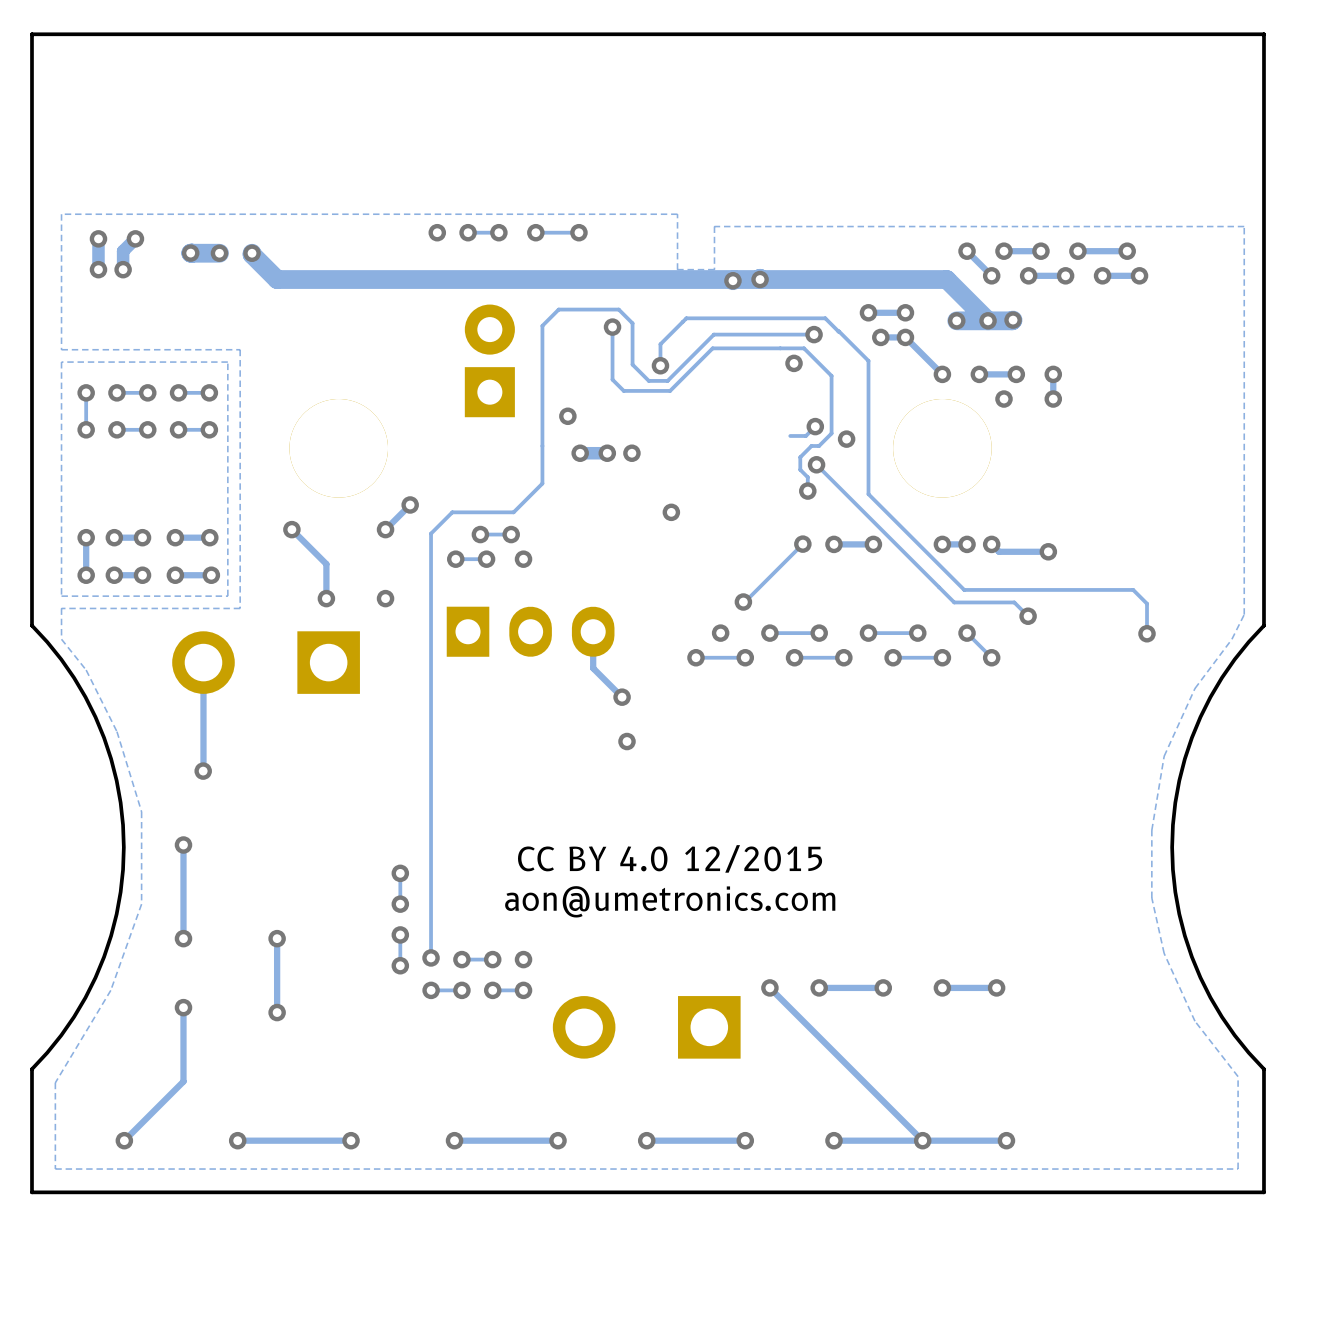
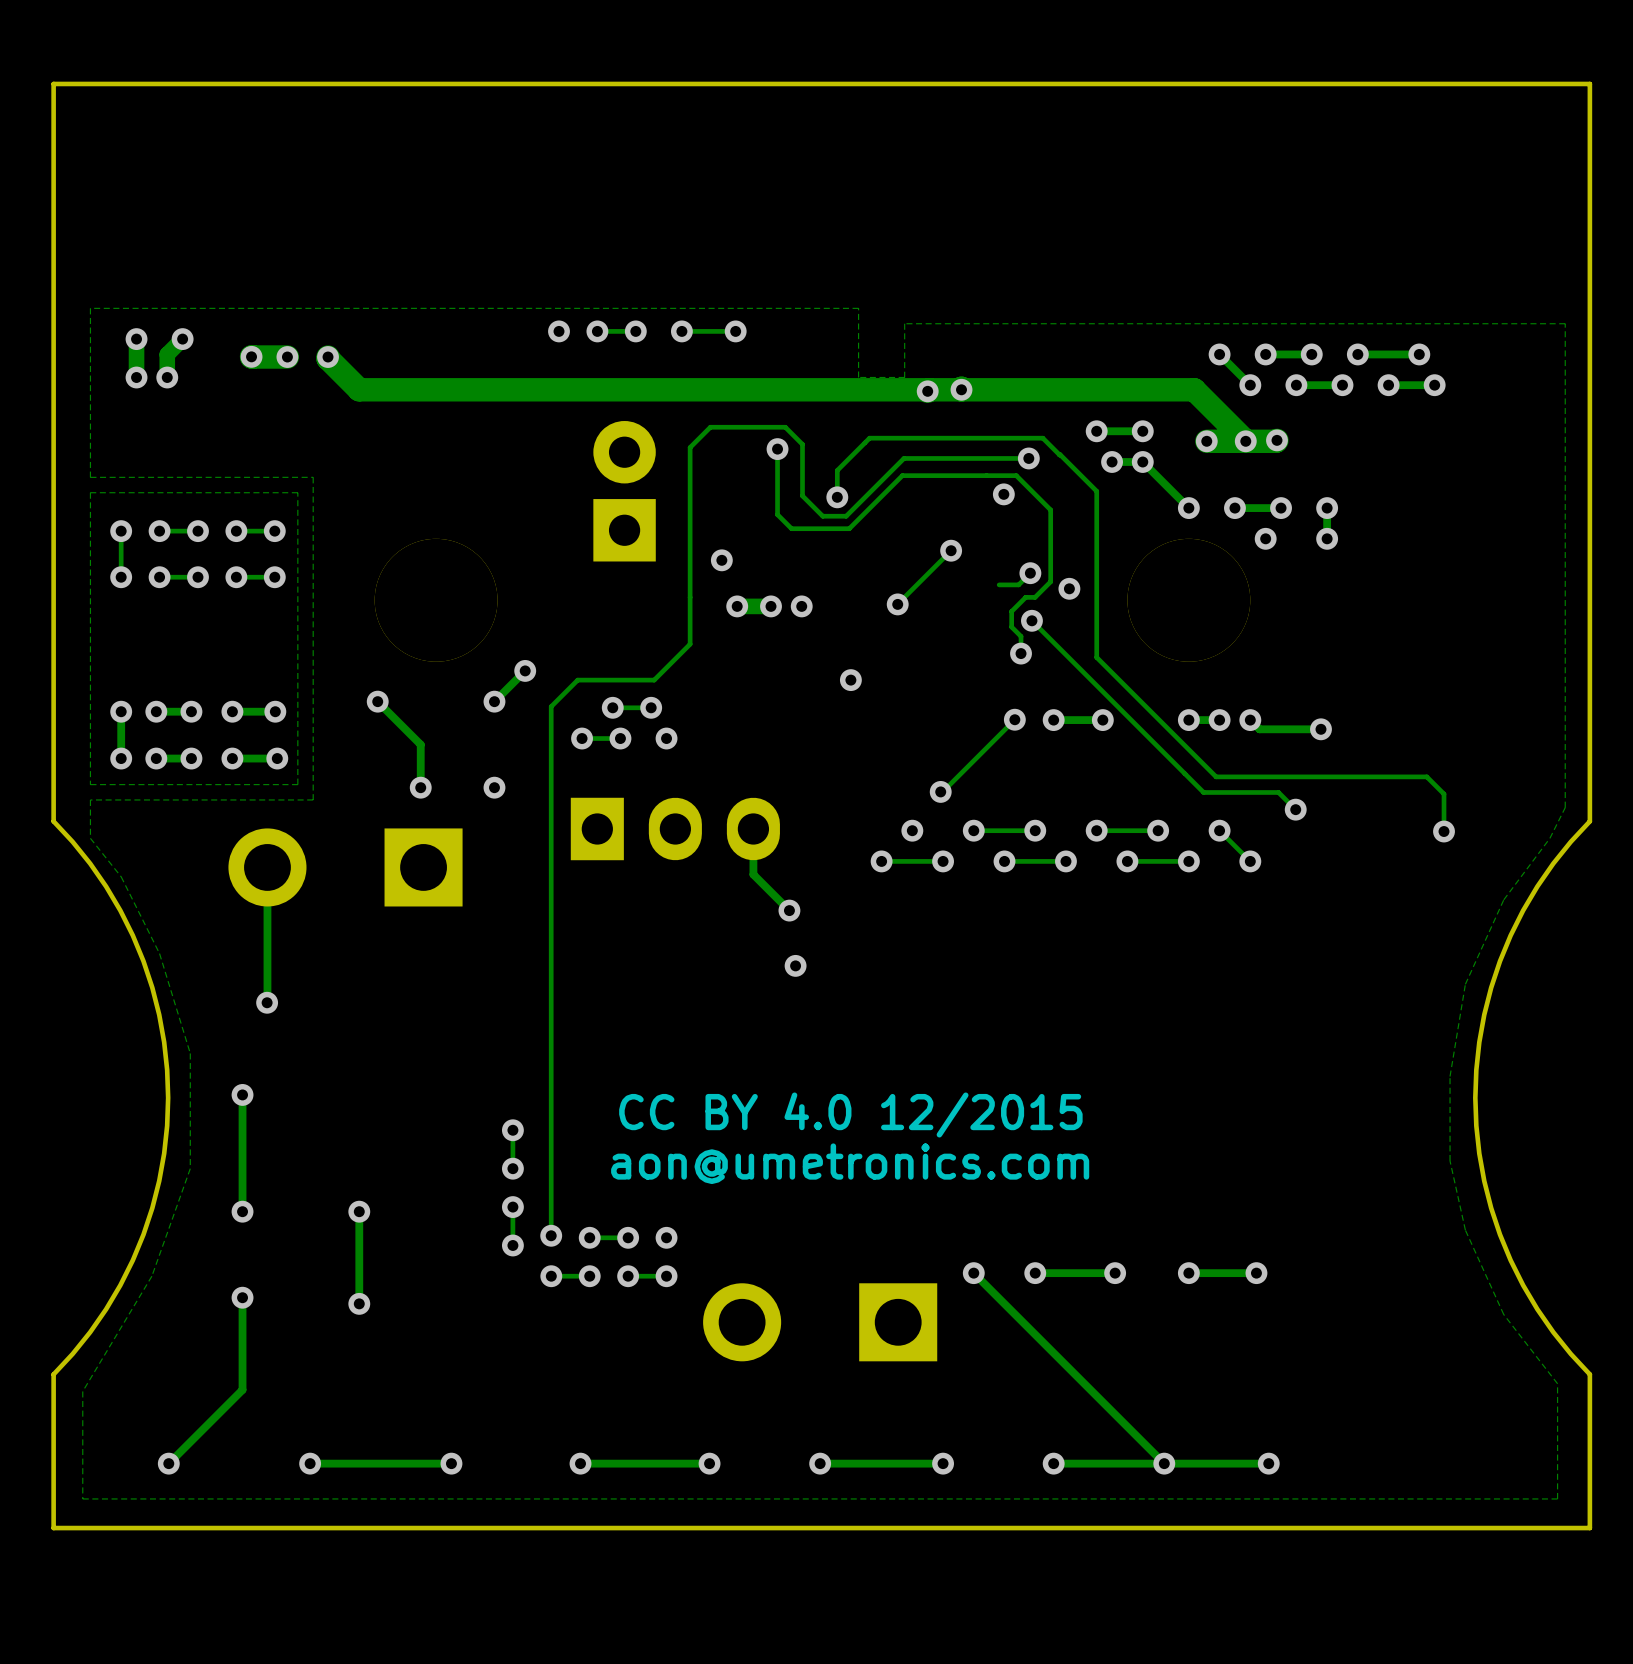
track: none -> (951, 550) (897, 604)
via: none -> (951, 550)
via: none -> (897, 604)

